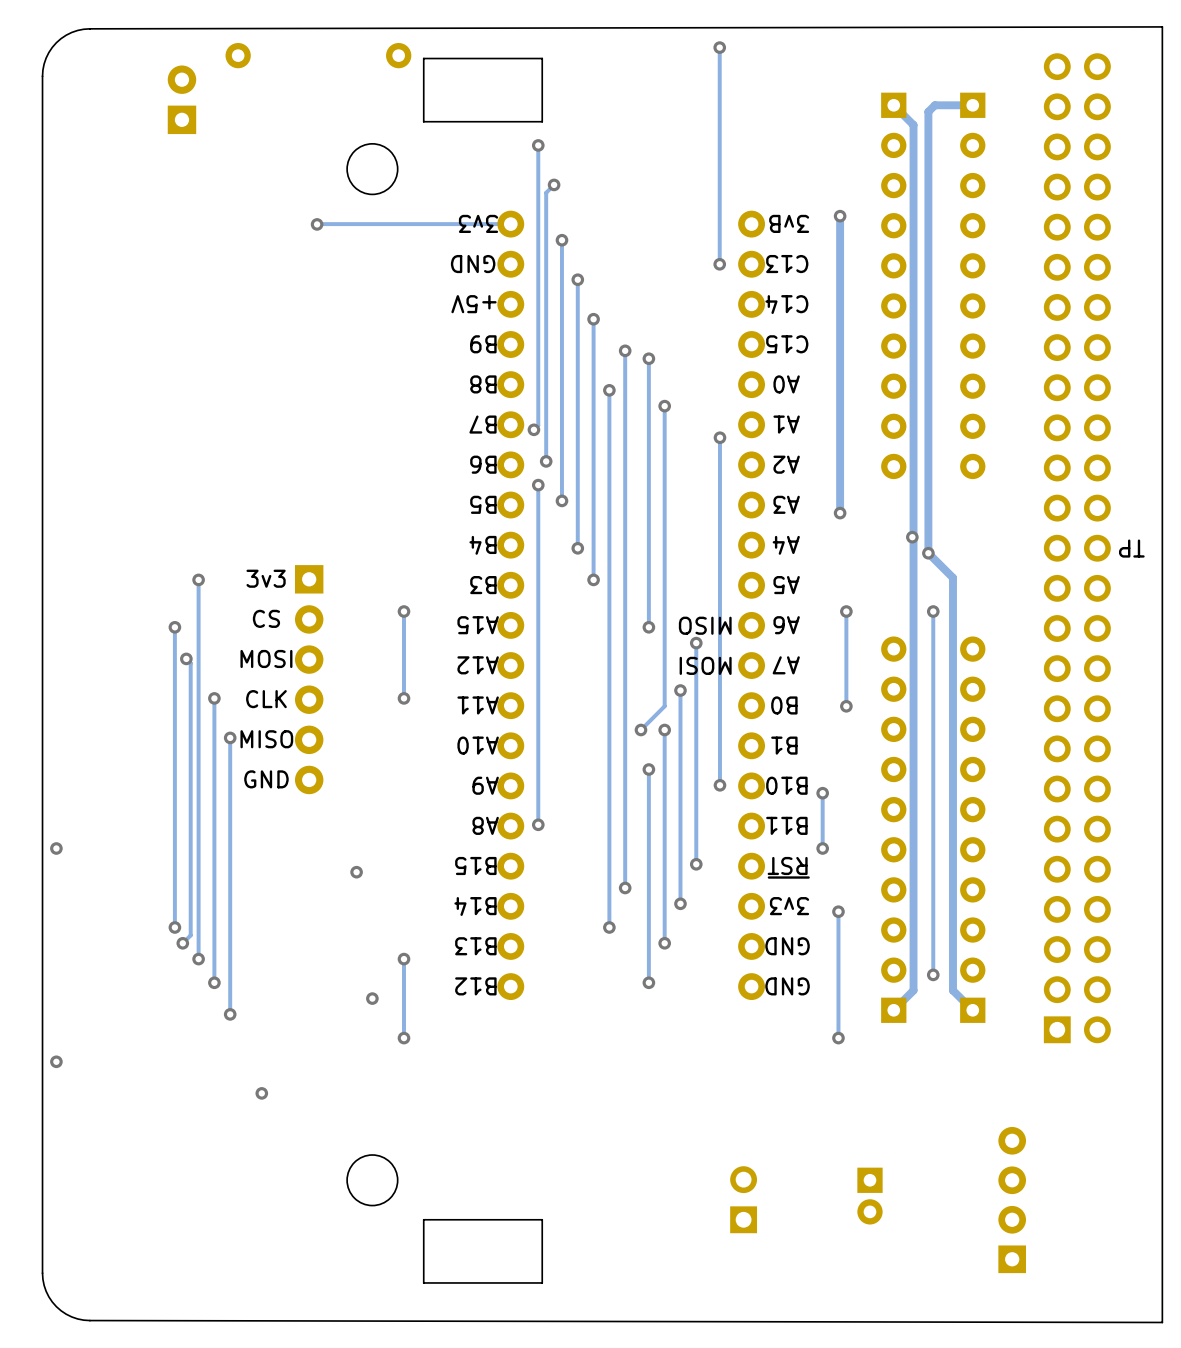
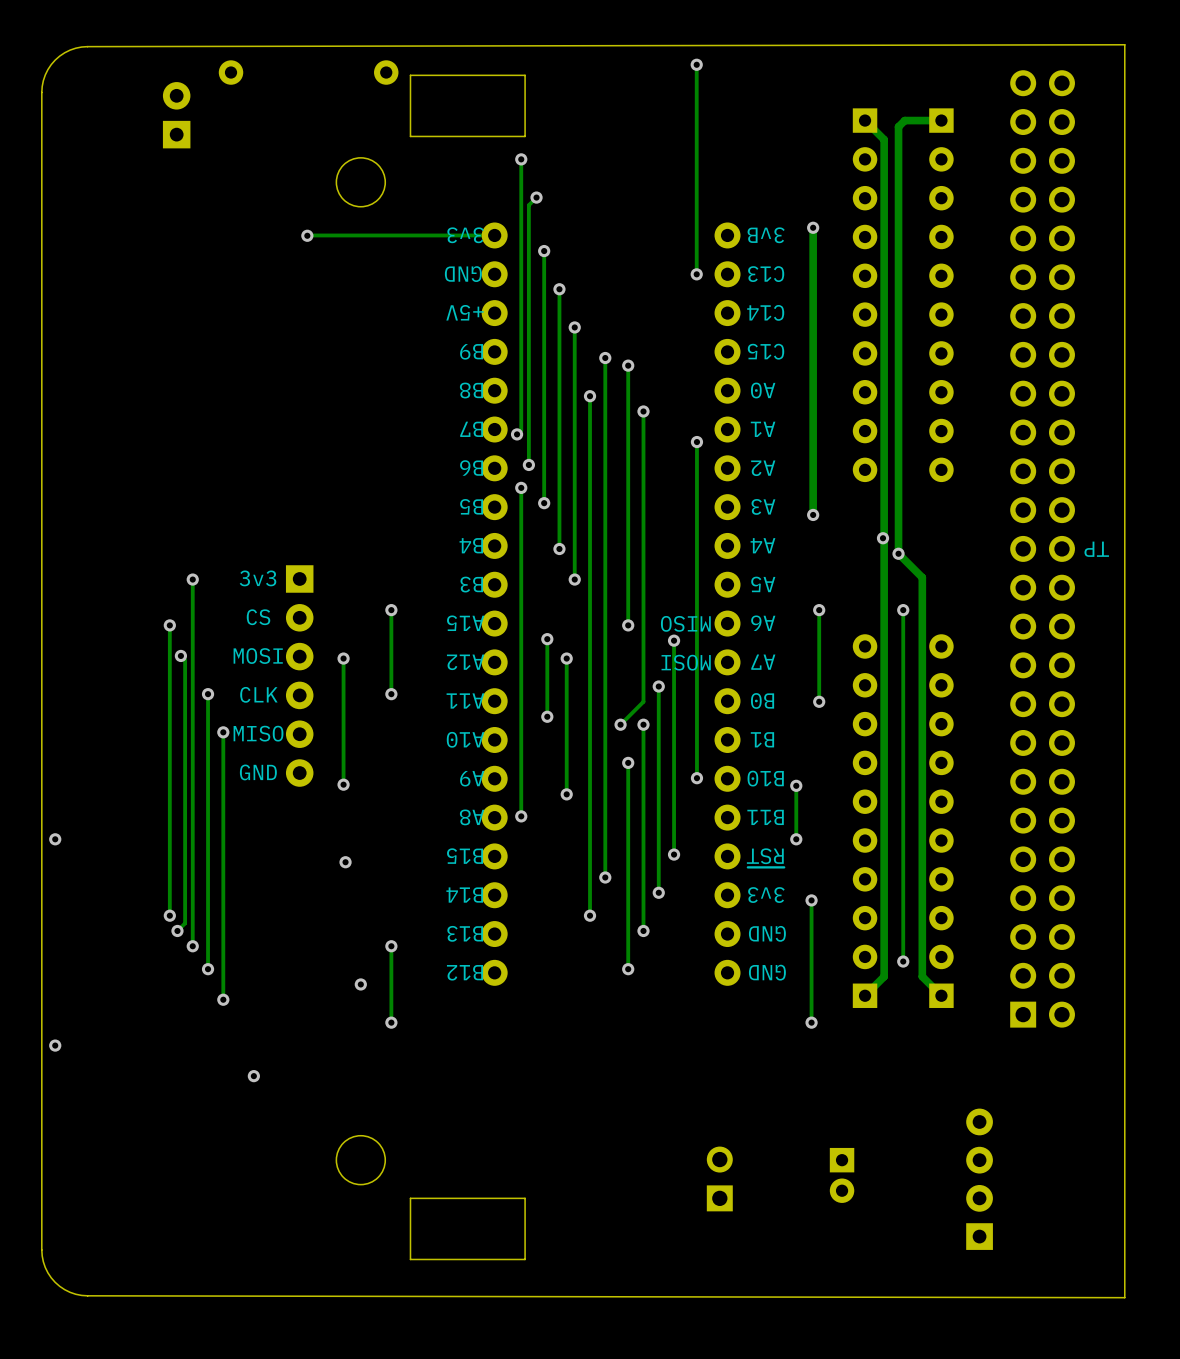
track: none -> (547, 639) (547, 716)
via: none -> (547, 639)
track: none -> (343, 658) (343, 784)
via: none -> (343, 658)
track: none -> (566, 658) (566, 794)
via: none -> (566, 658)
via: none -> (547, 716)
via: none -> (343, 784)
via: none -> (566, 794)

